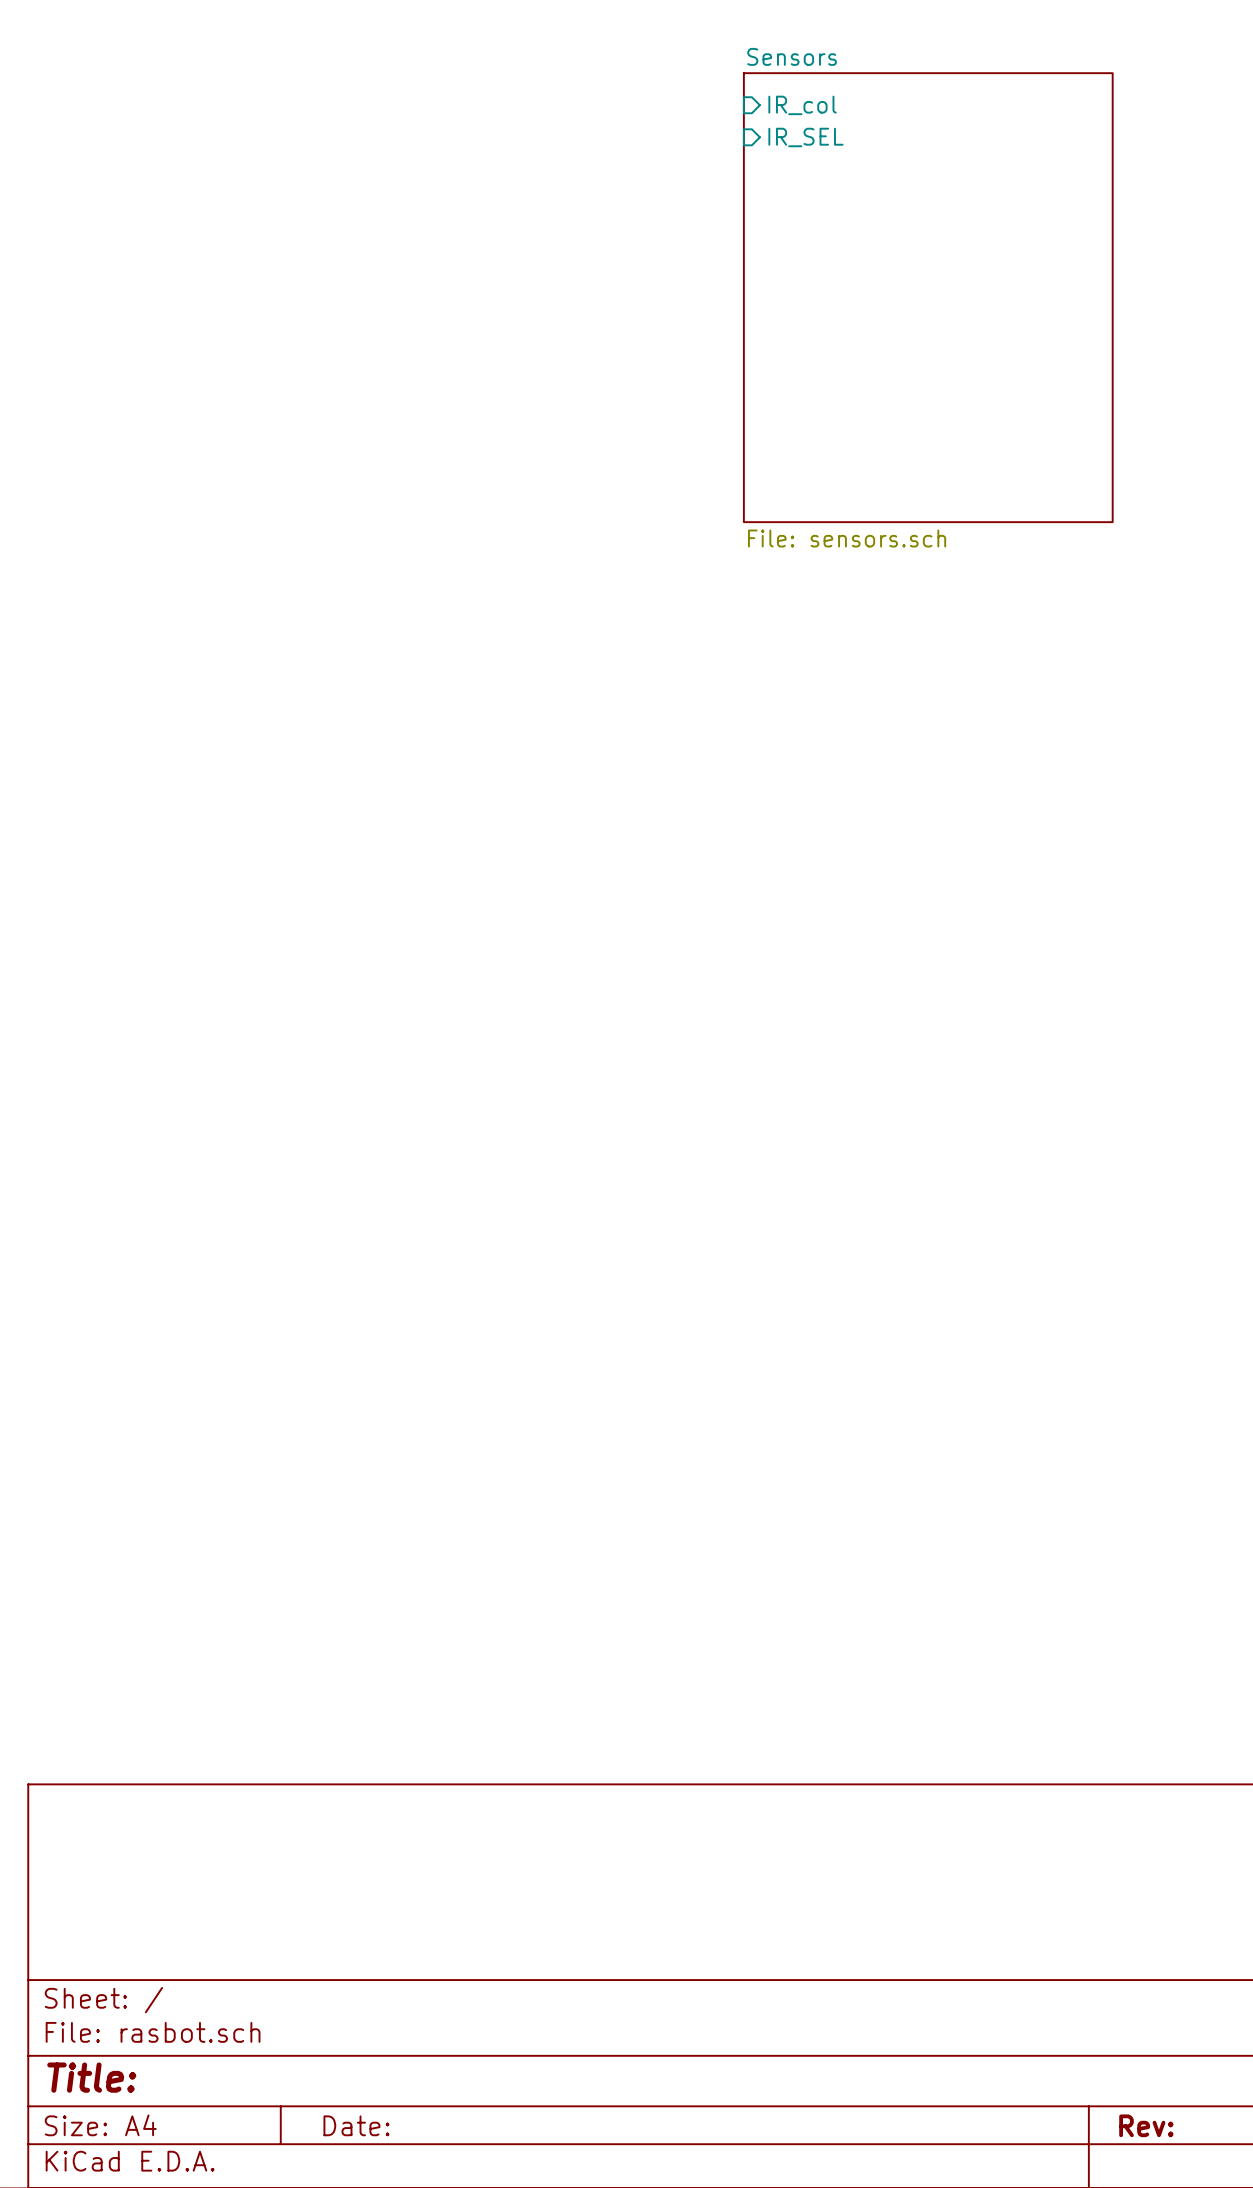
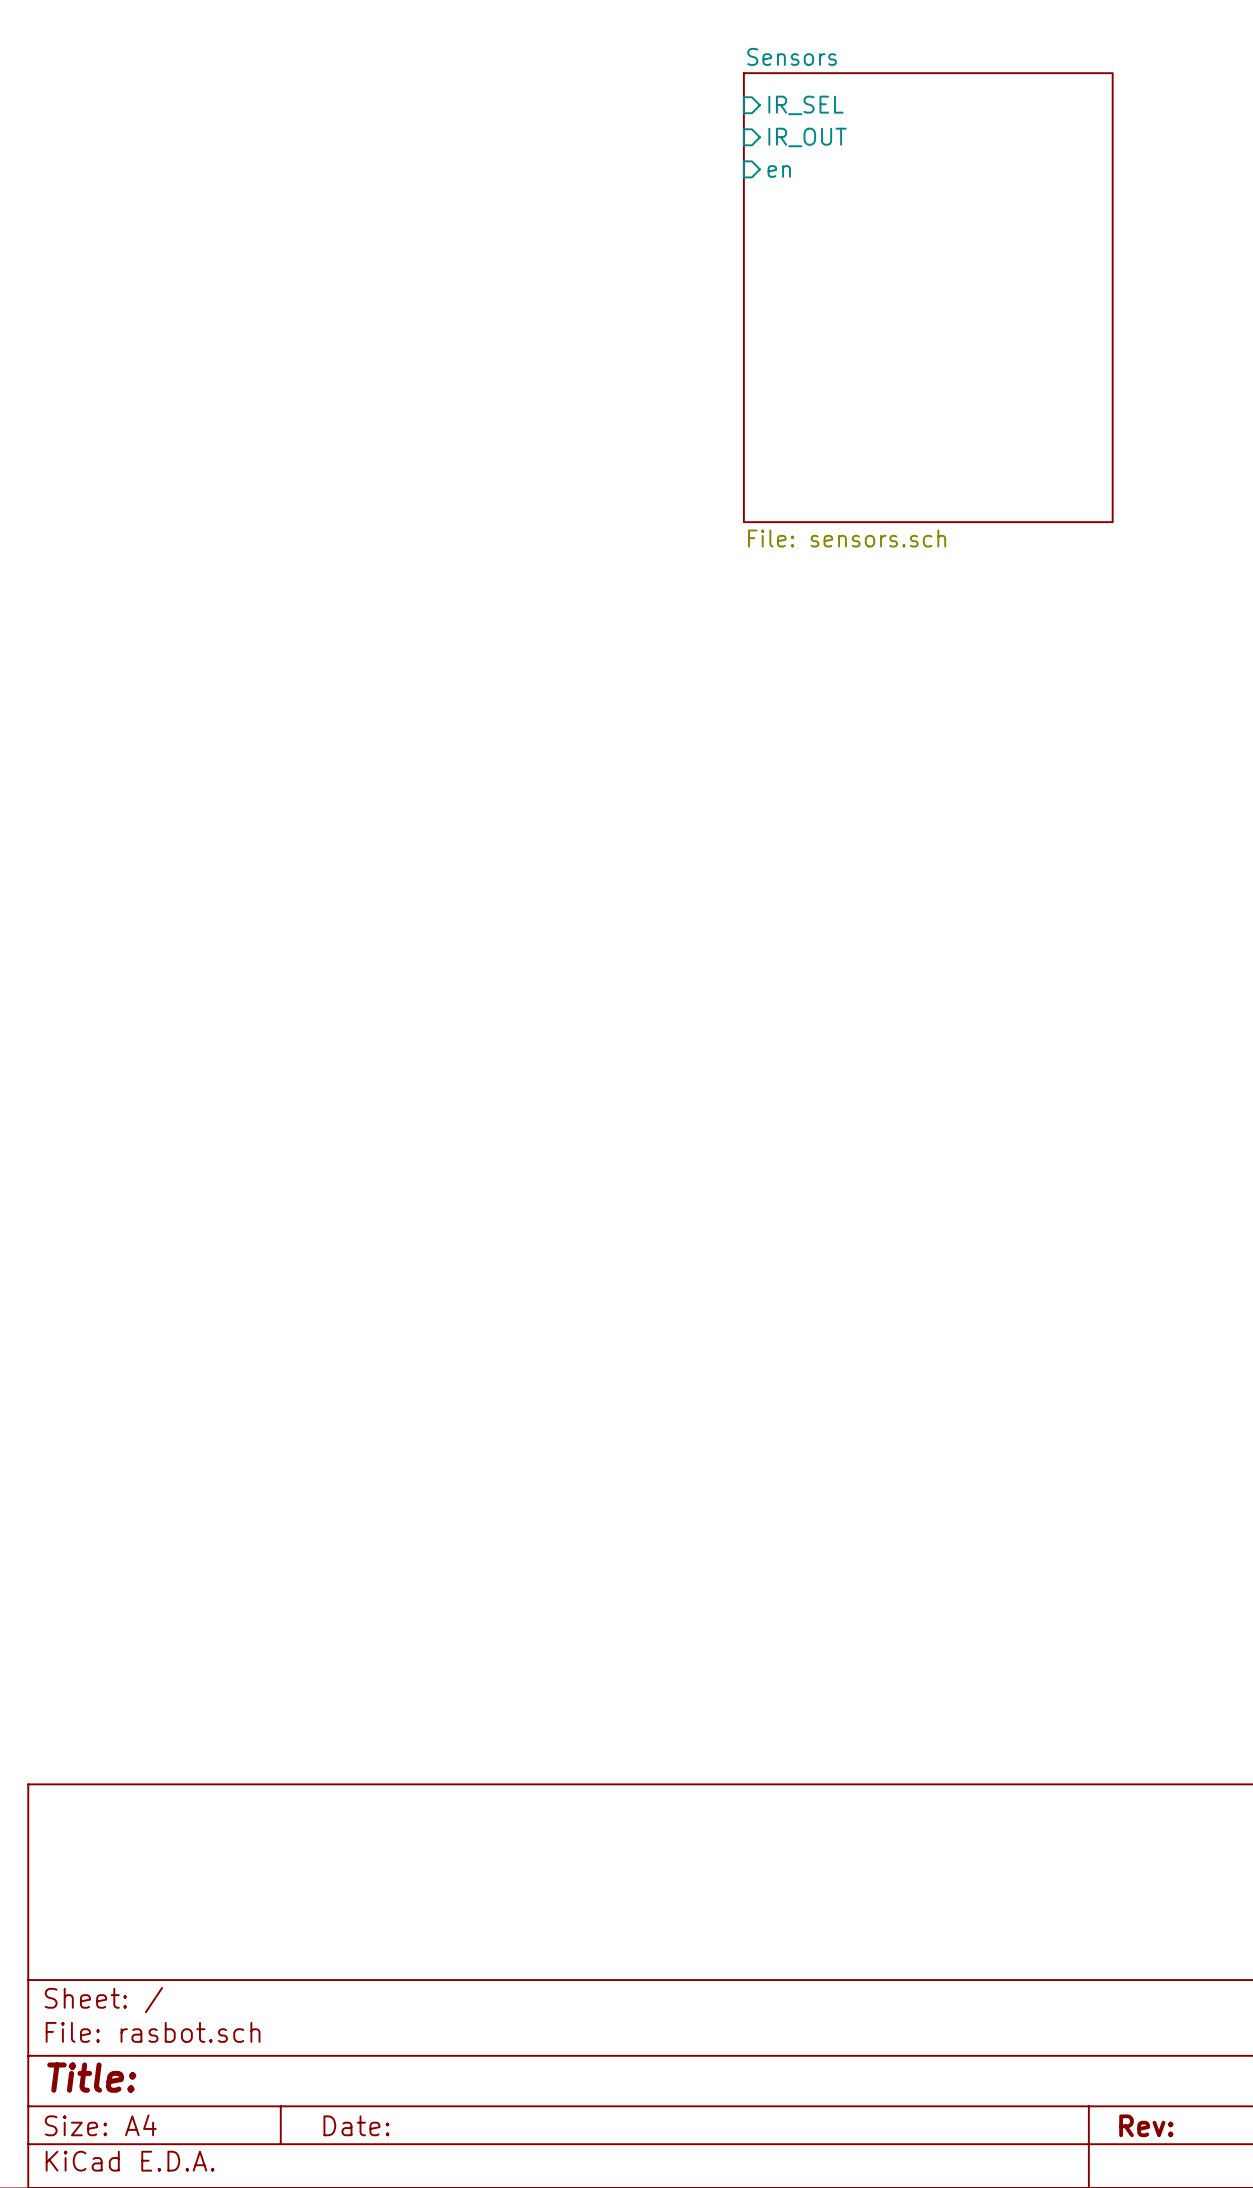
sheet pin: IR_col (802, 105) -> IR_SEL (805, 105)
sheet pin: IR_SEL (805, 137) -> IR_OUT (807, 137)
sheet pin: none -> en (779, 171)

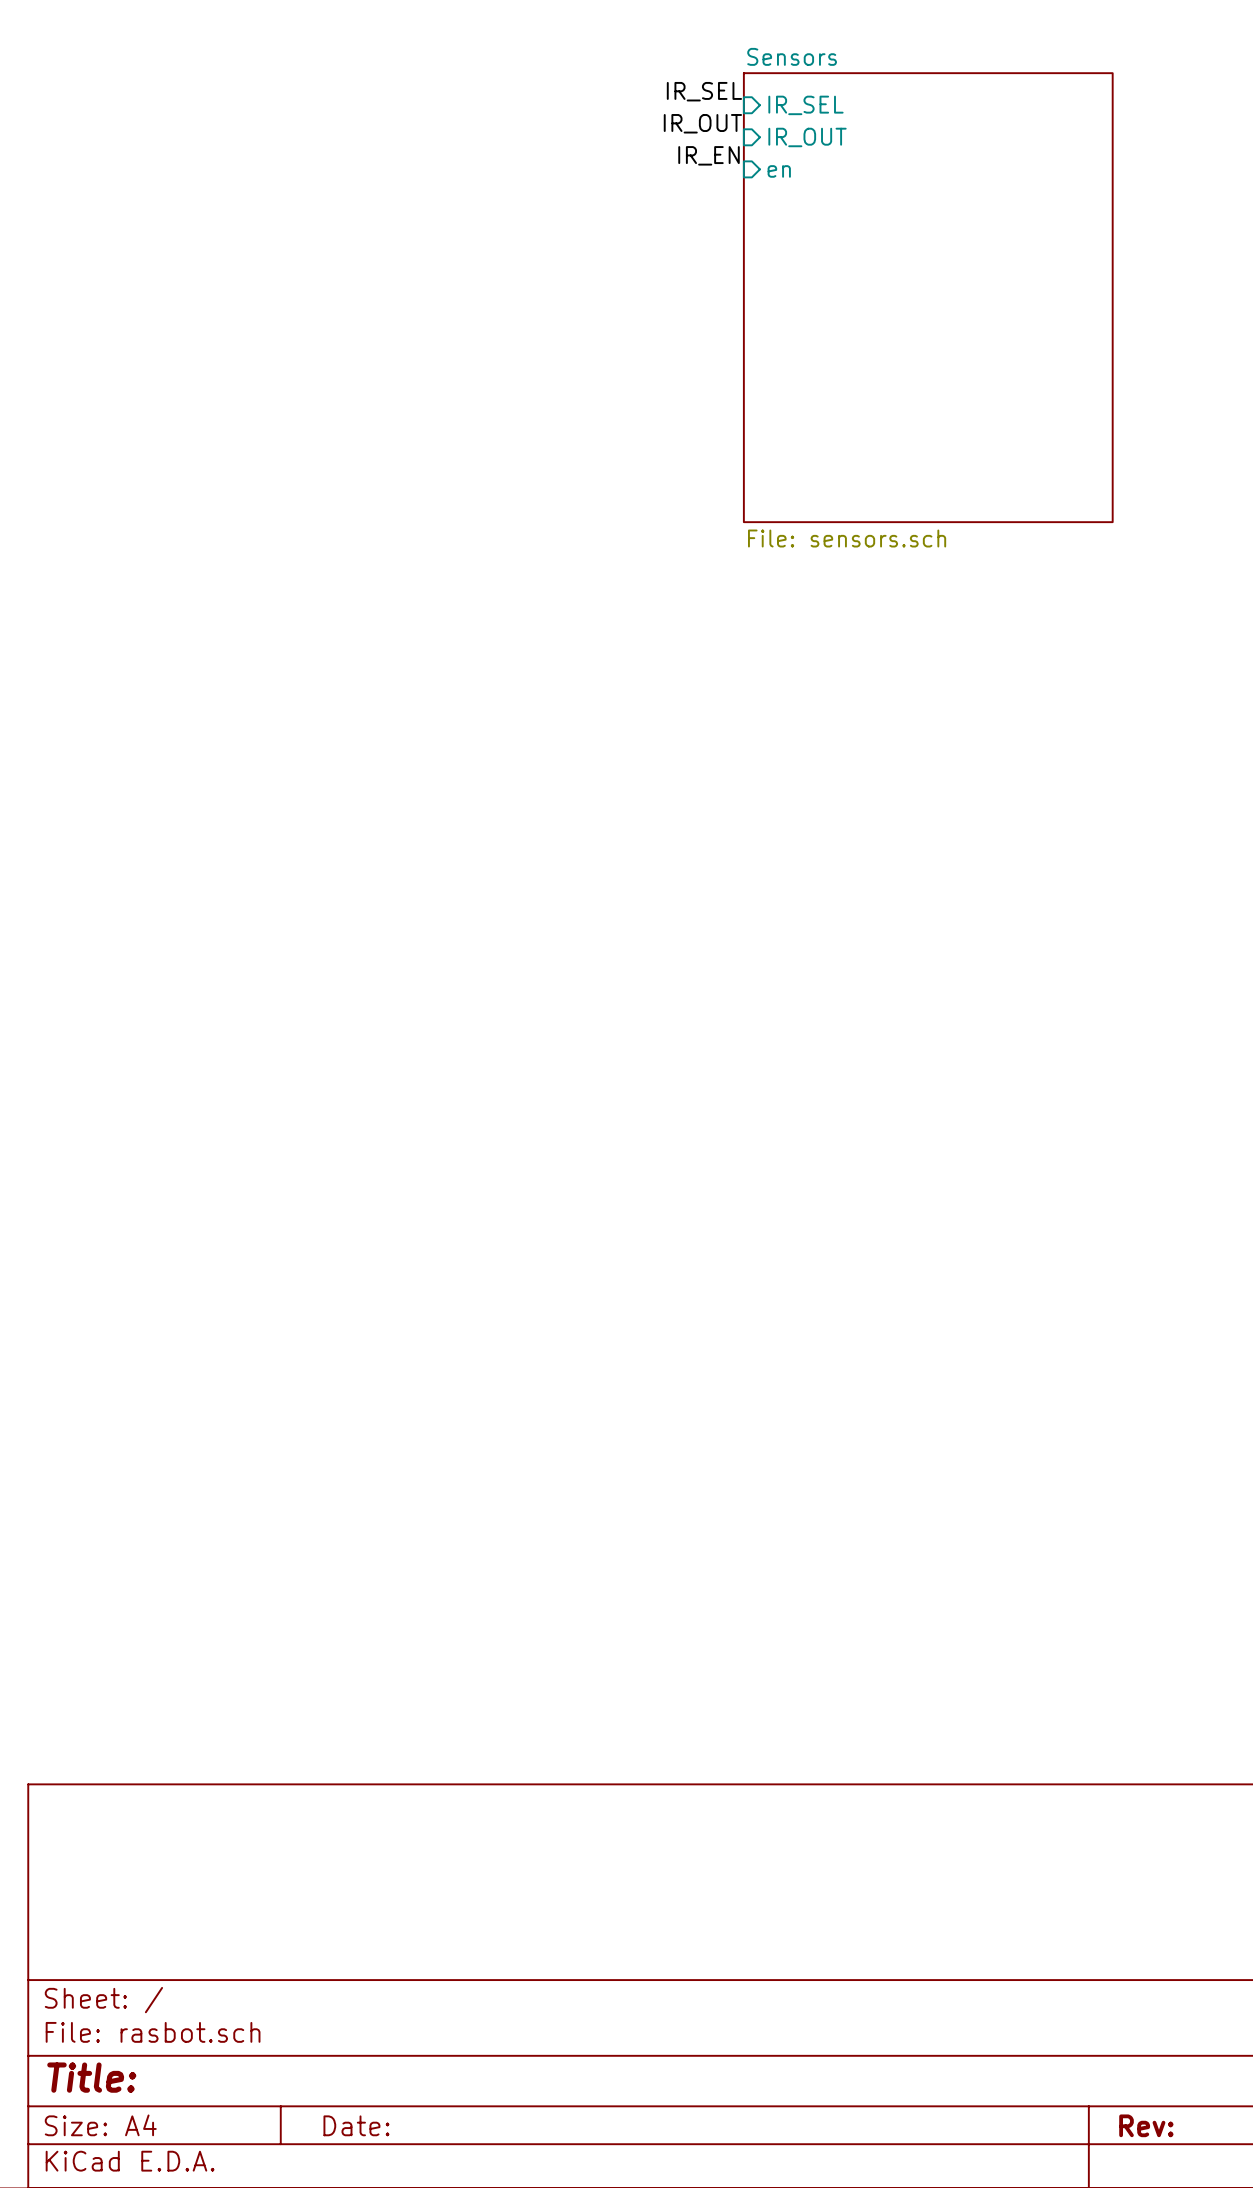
label: none -> IR_SEL (704, 91)
label: none -> IR_OUT (702, 123)
label: none -> IR_EN (709, 155)

